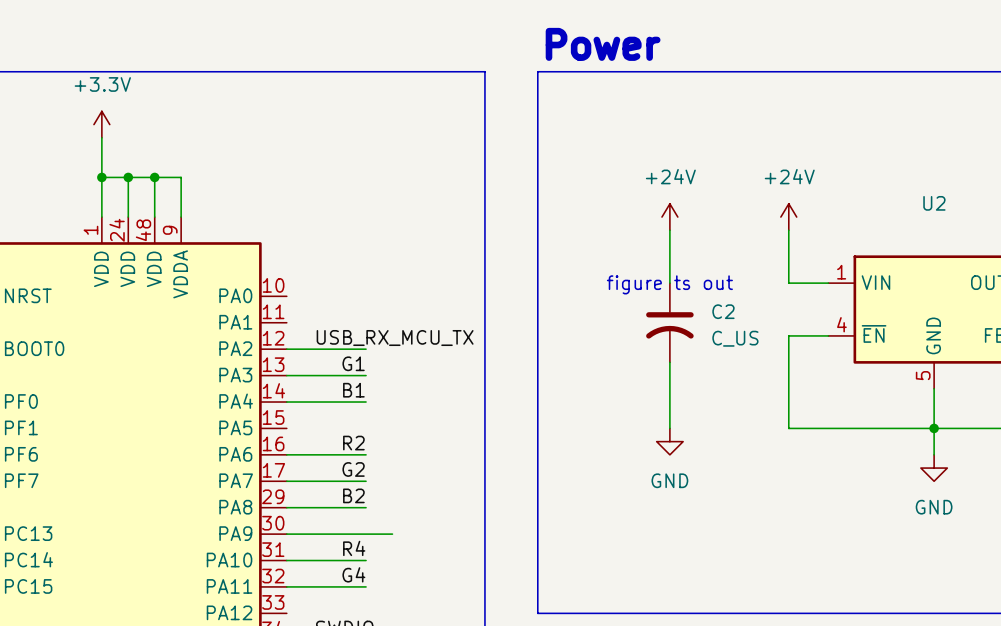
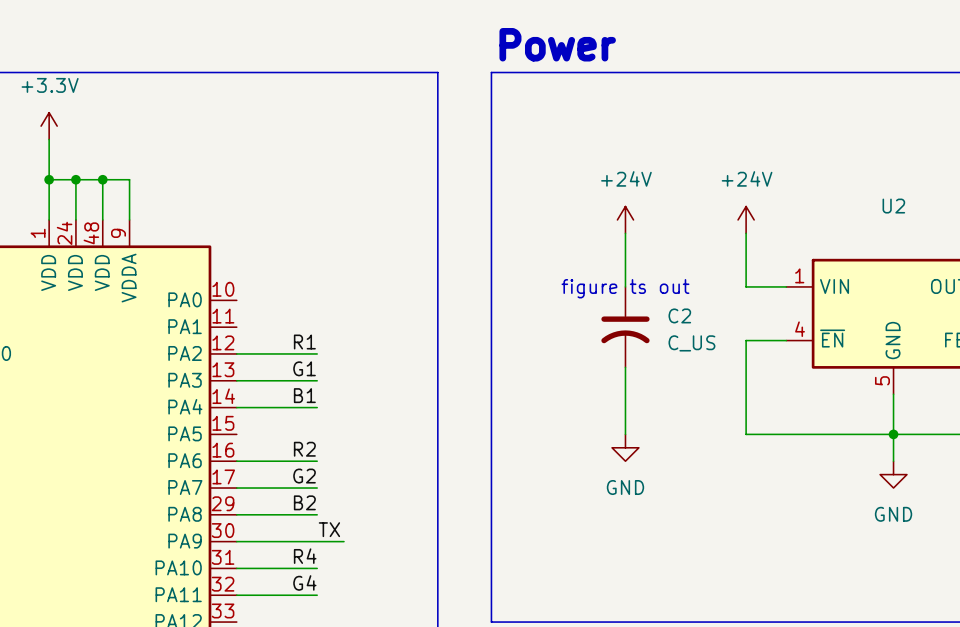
label: none -> R1 (304, 342)
label: USB_RX_MCU_TX (395, 338) -> none
label: none -> TX (329, 529)

